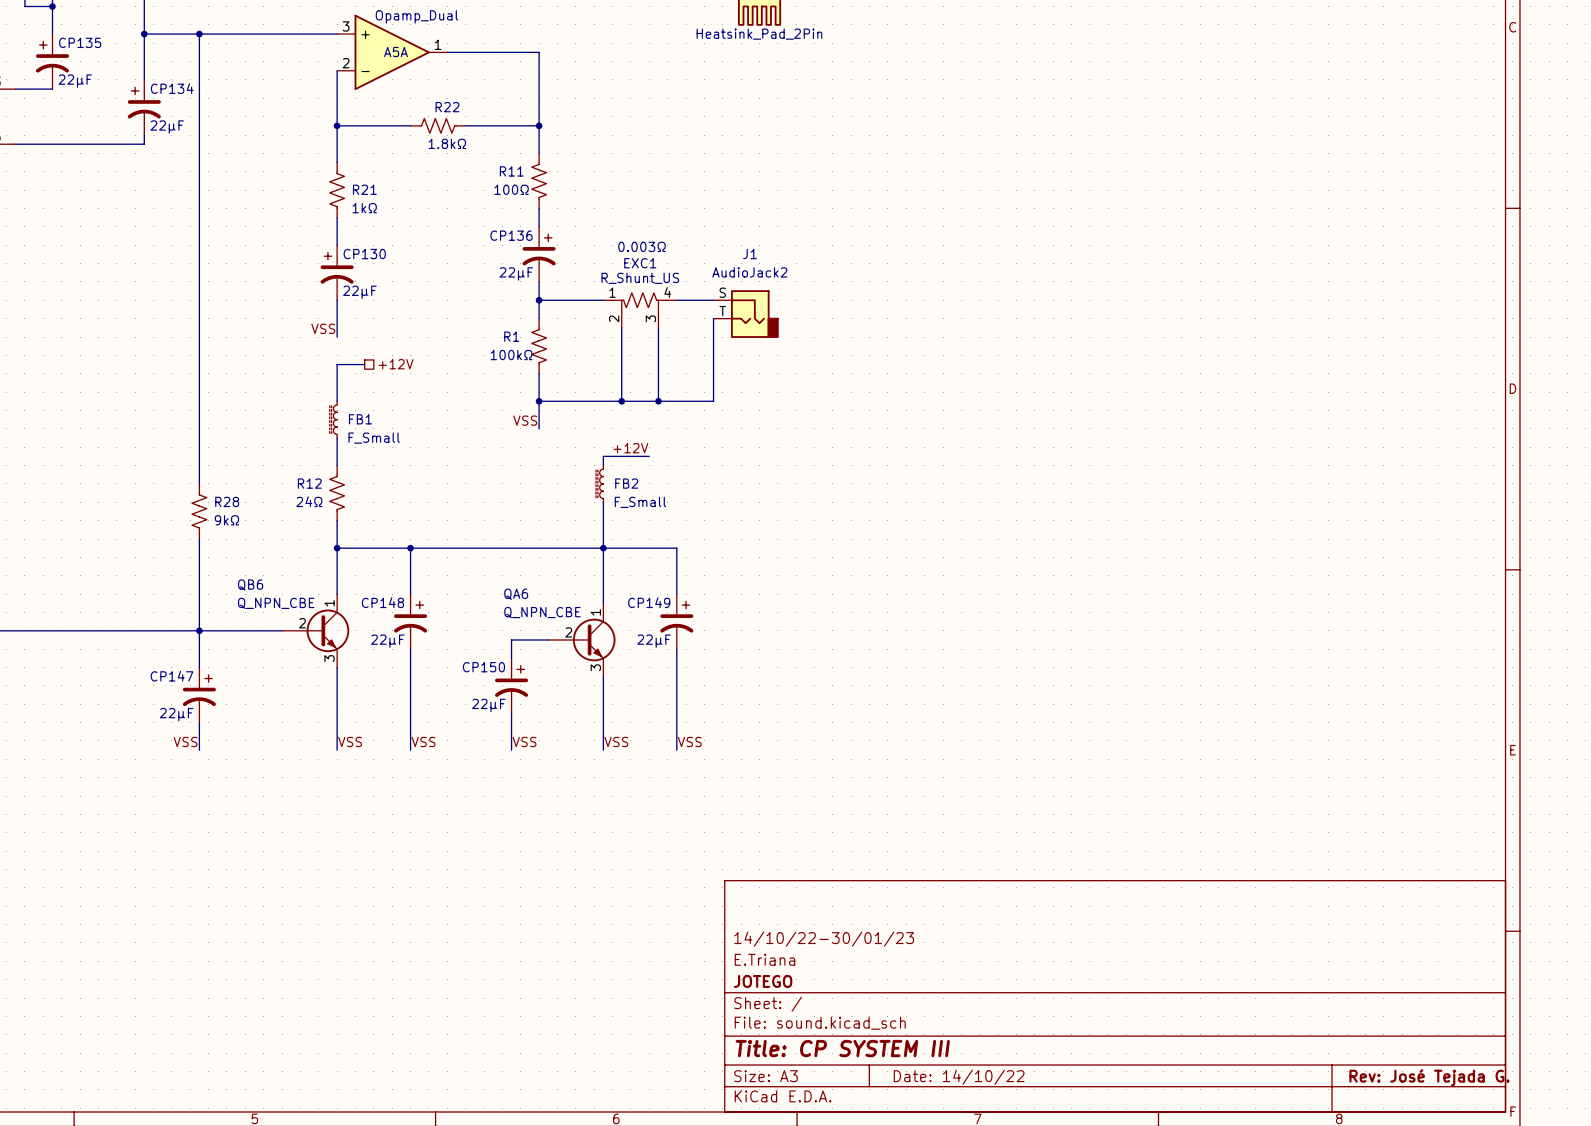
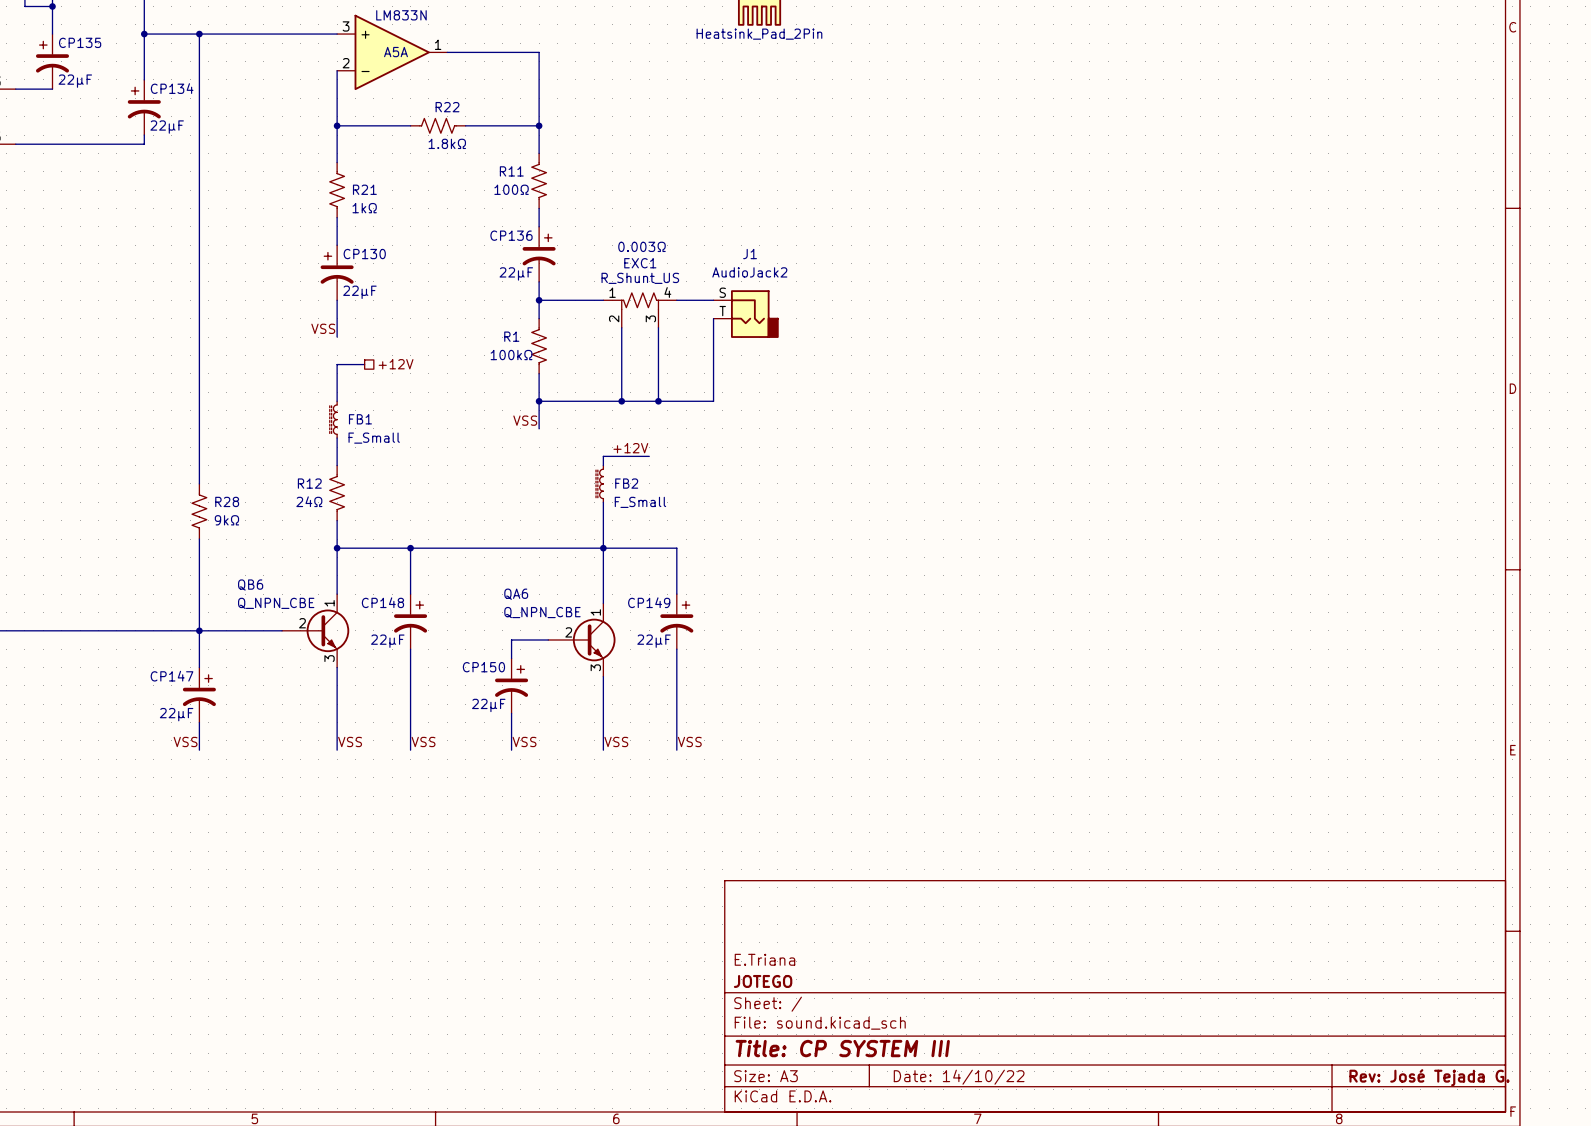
A5A value: Opamp_Dual (416, 16) -> LM833N (401, 15)
title block: 14/10/22-30/01/23 (824, 939) -> none

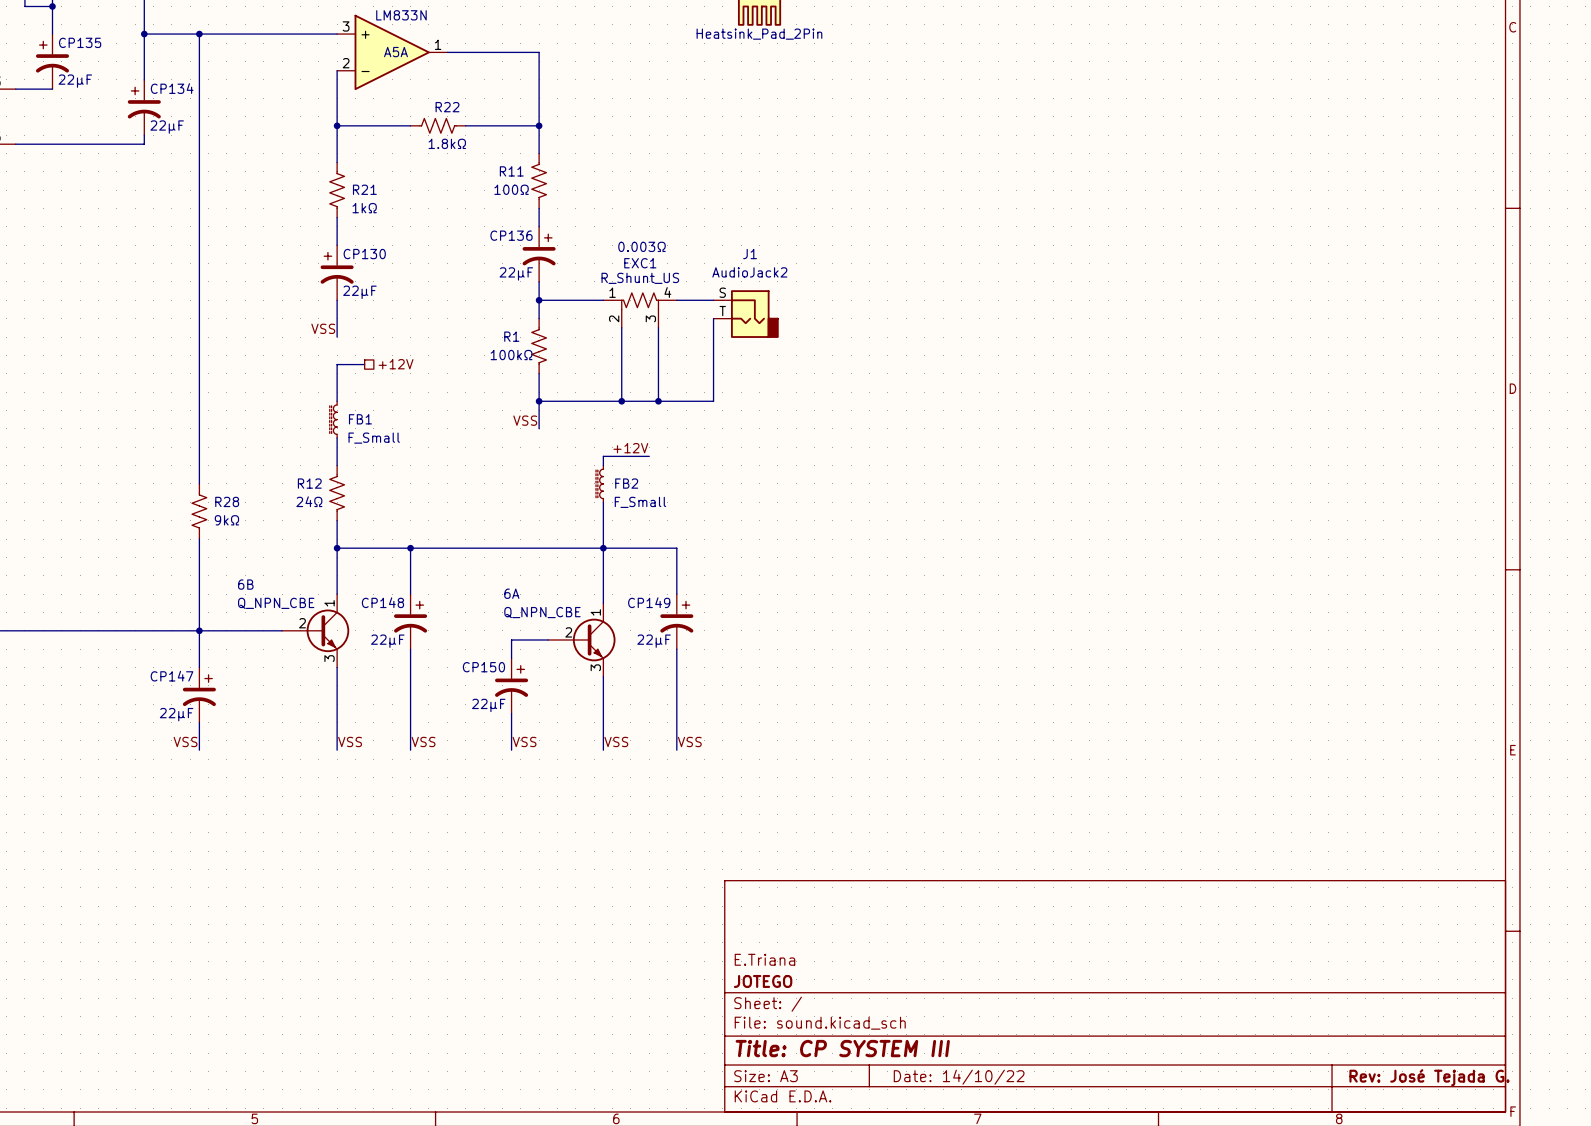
QB6 name: QB6 (250, 585) -> 6B (245, 584)
QA6 name: QA6 (516, 594) -> 6A (511, 593)

